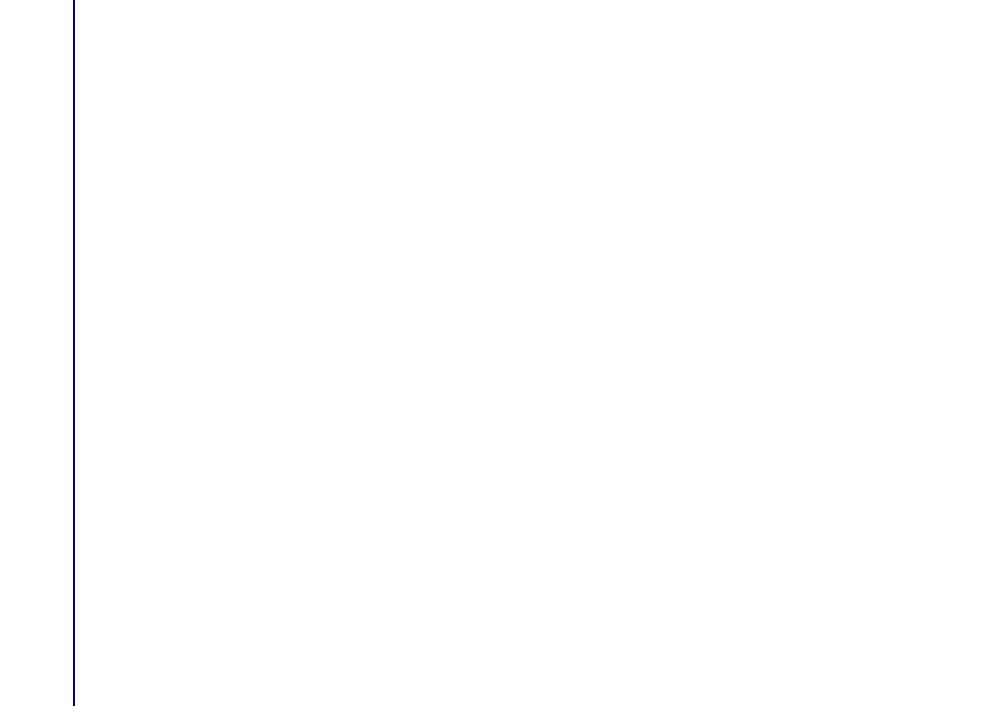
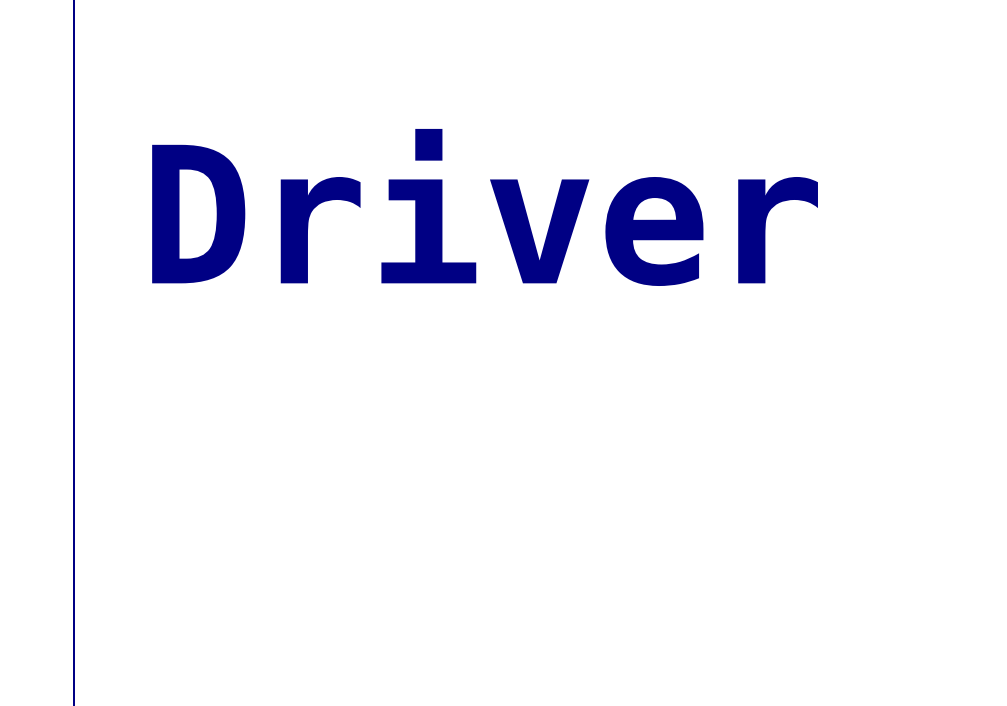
text: none -> Driver (485, 207)

